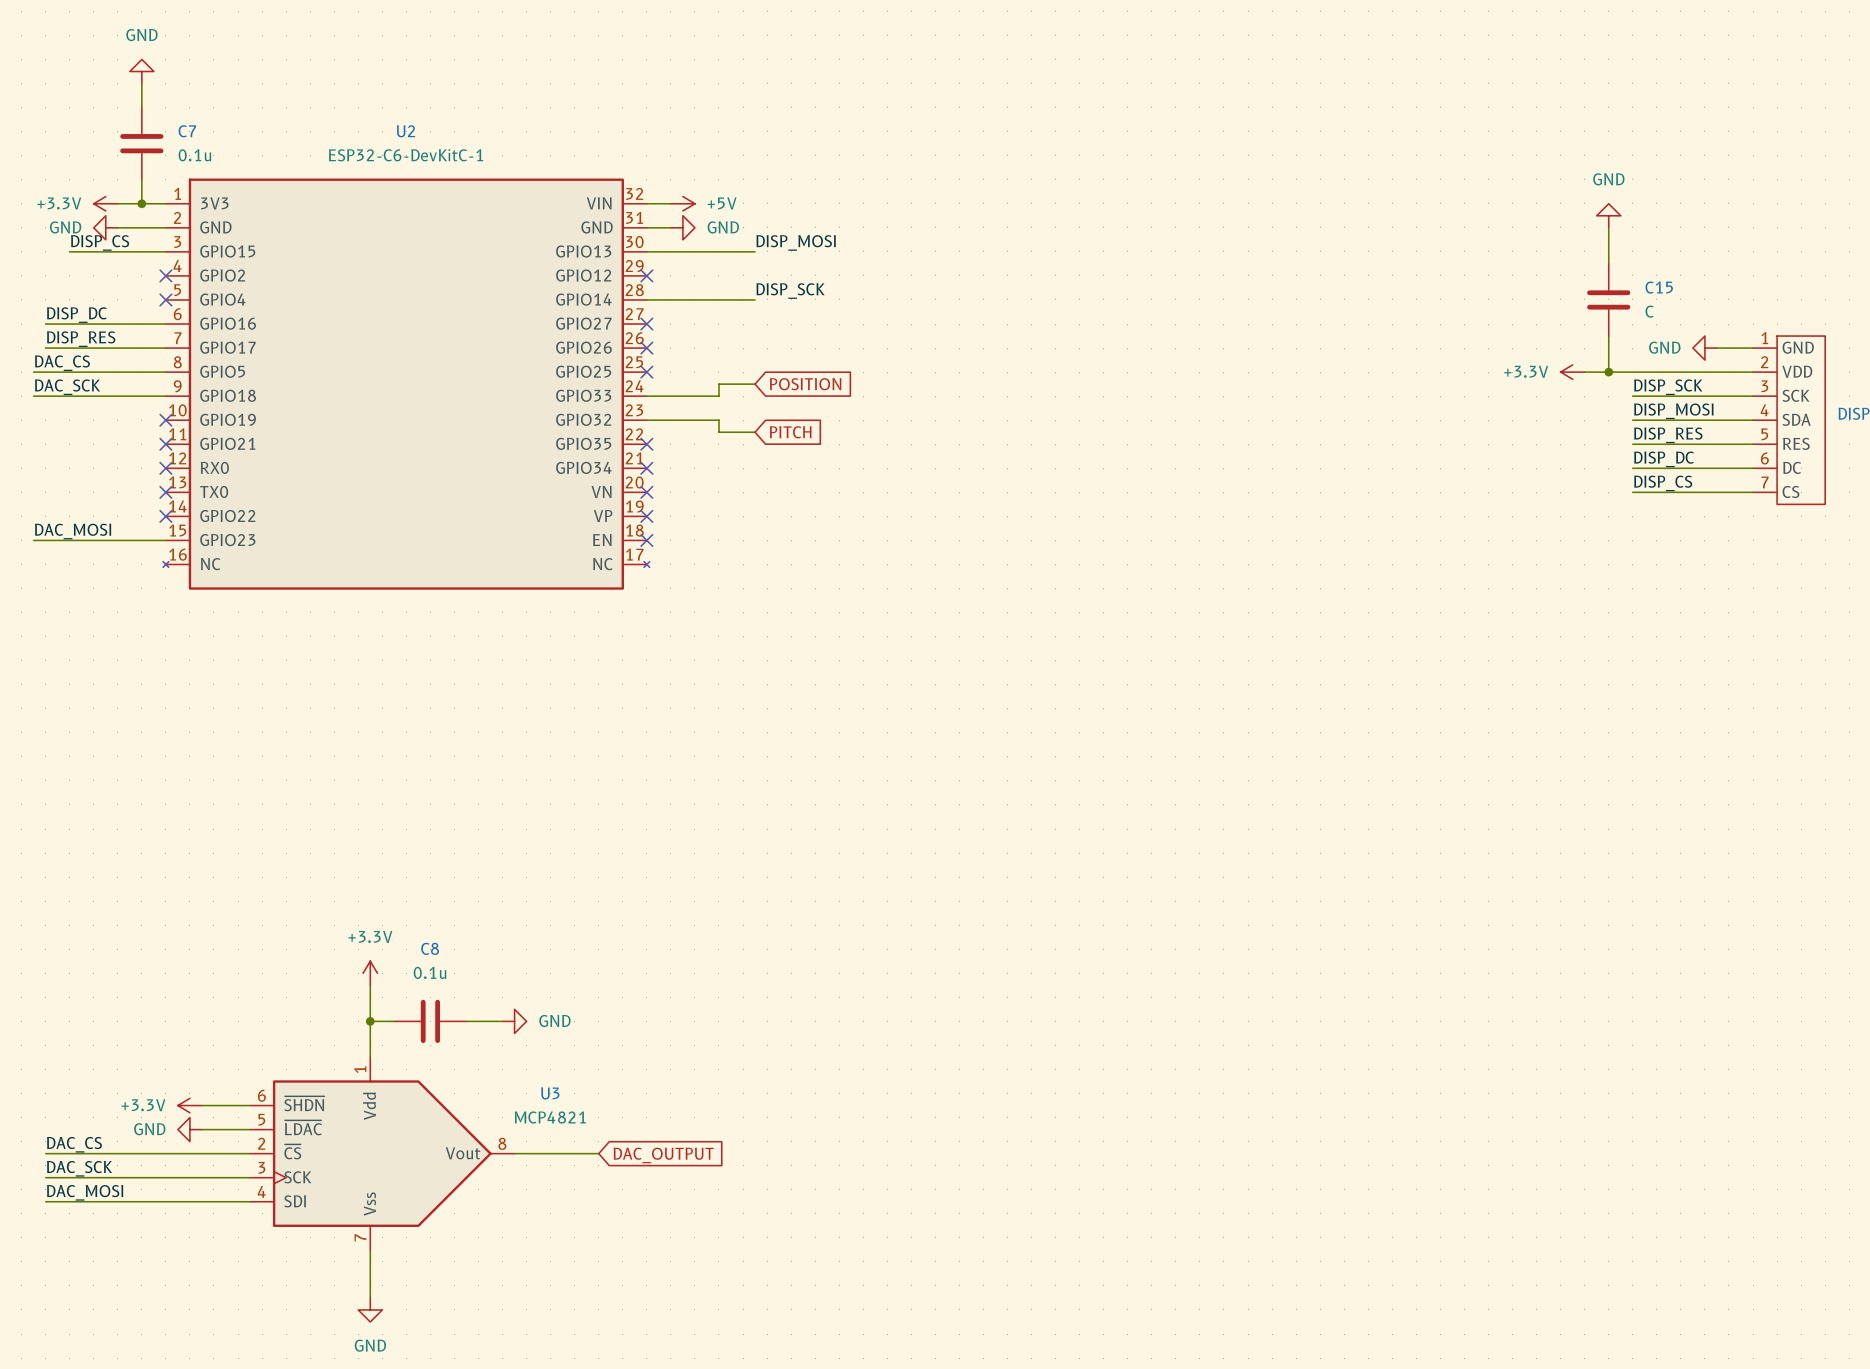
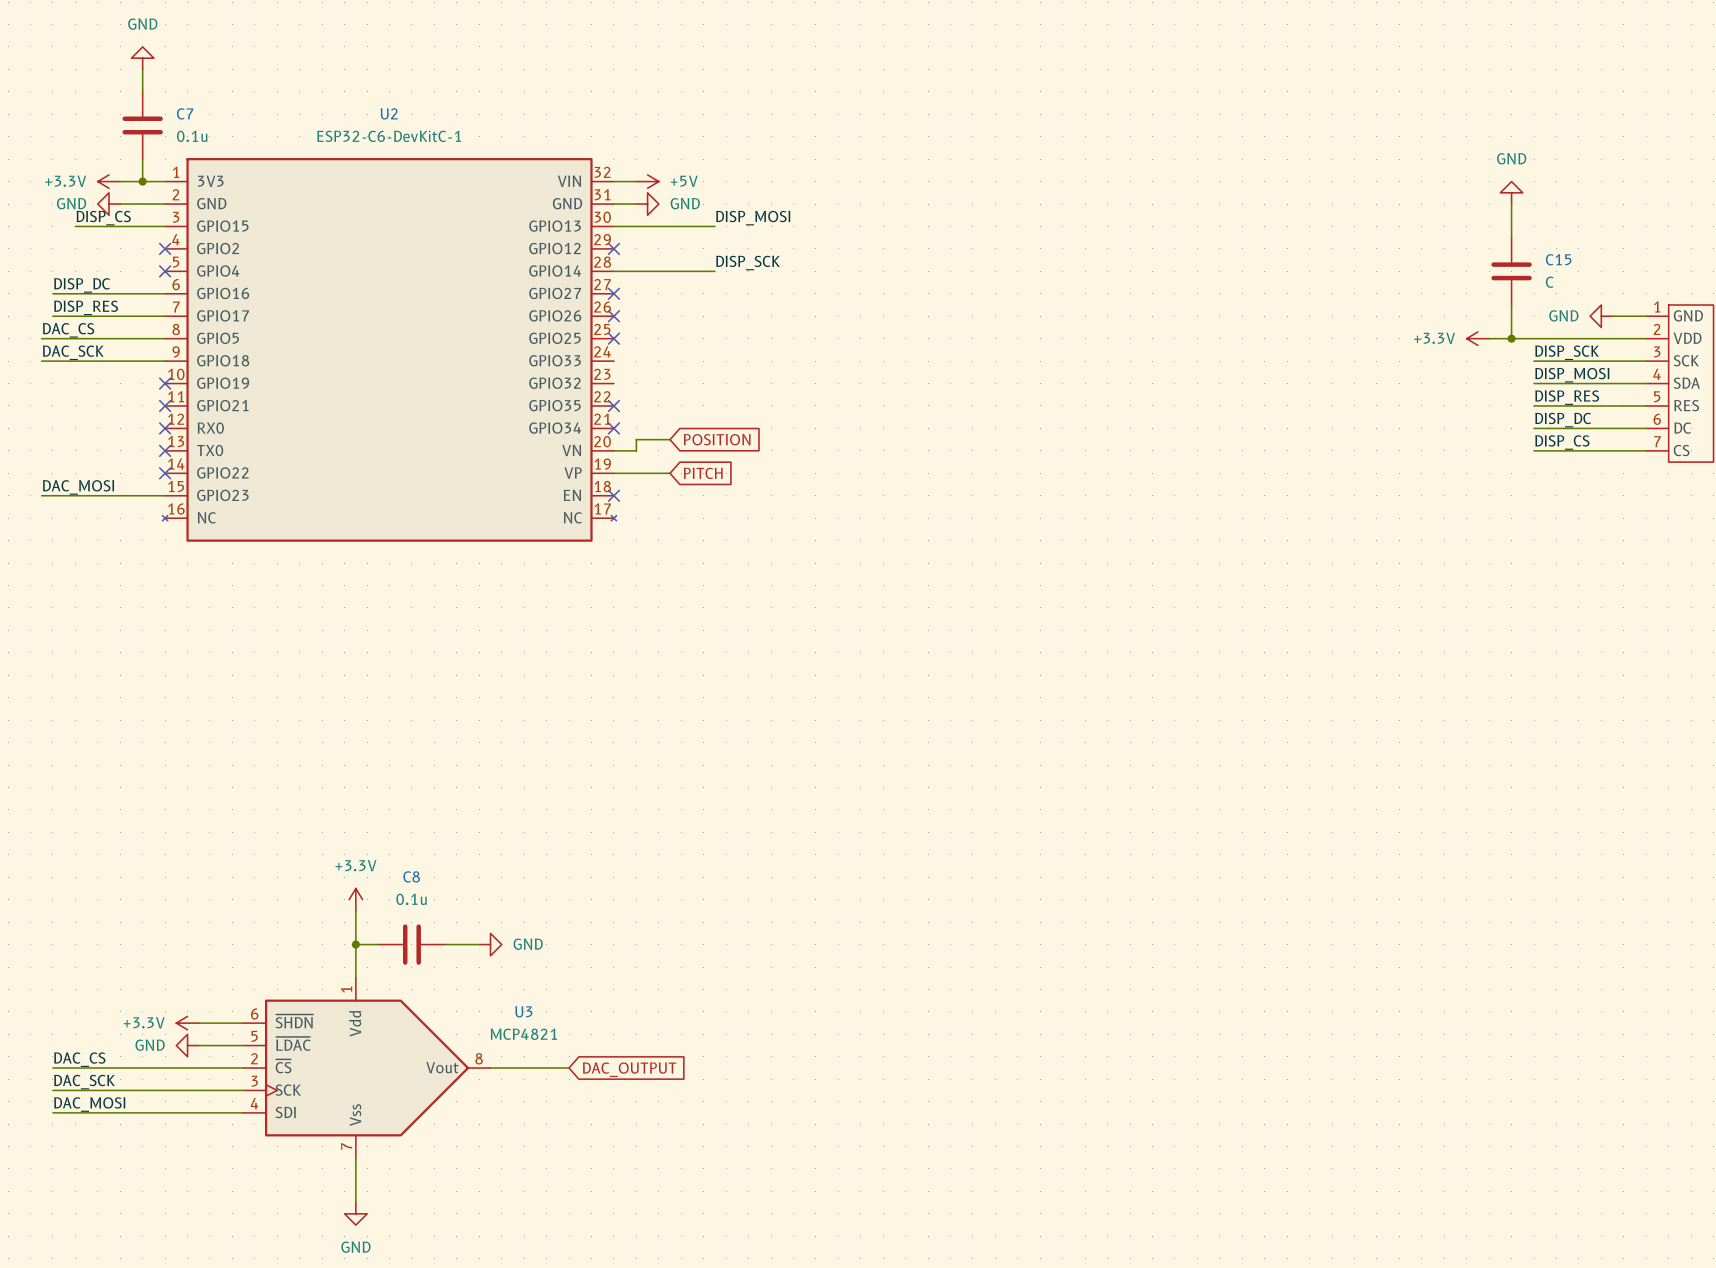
wire: (755, 384) (718, 384) (718, 396) (646, 396) -> none
global label position: POSITION (805, 384) -> POSITION (717, 439)
wire: (646, 420) (718, 420) (718, 432) (755, 432) -> none
global label position: PITCH (790, 432) -> PITCH (703, 473)
wire: none -> (670, 439) (636, 439) (636, 450) (613, 450)
no-connect mark: (646, 492) -> none
wire: none -> (613, 473) (670, 473)
no-connect mark: (646, 516) -> none

